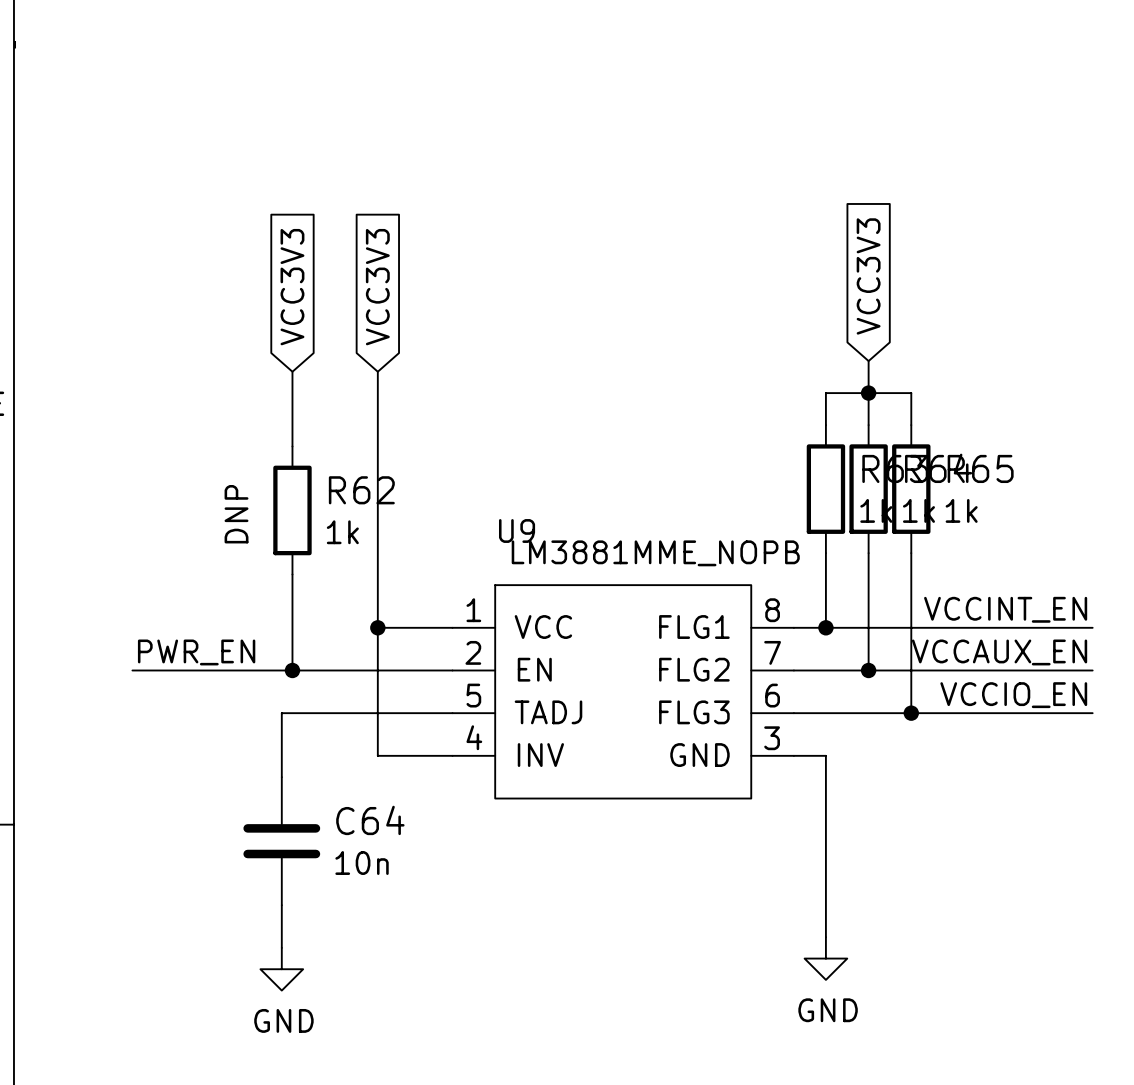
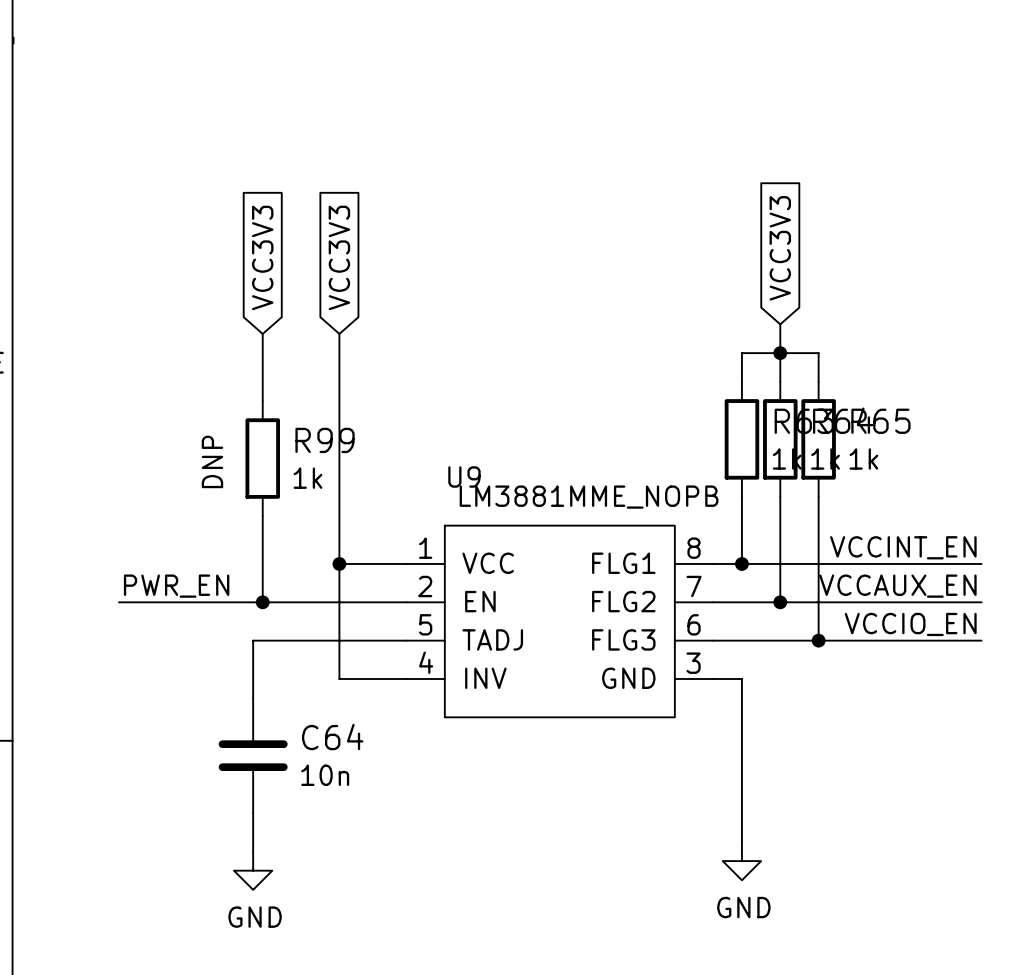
R62 name: R62 (361, 490) -> R99 (325, 440)

